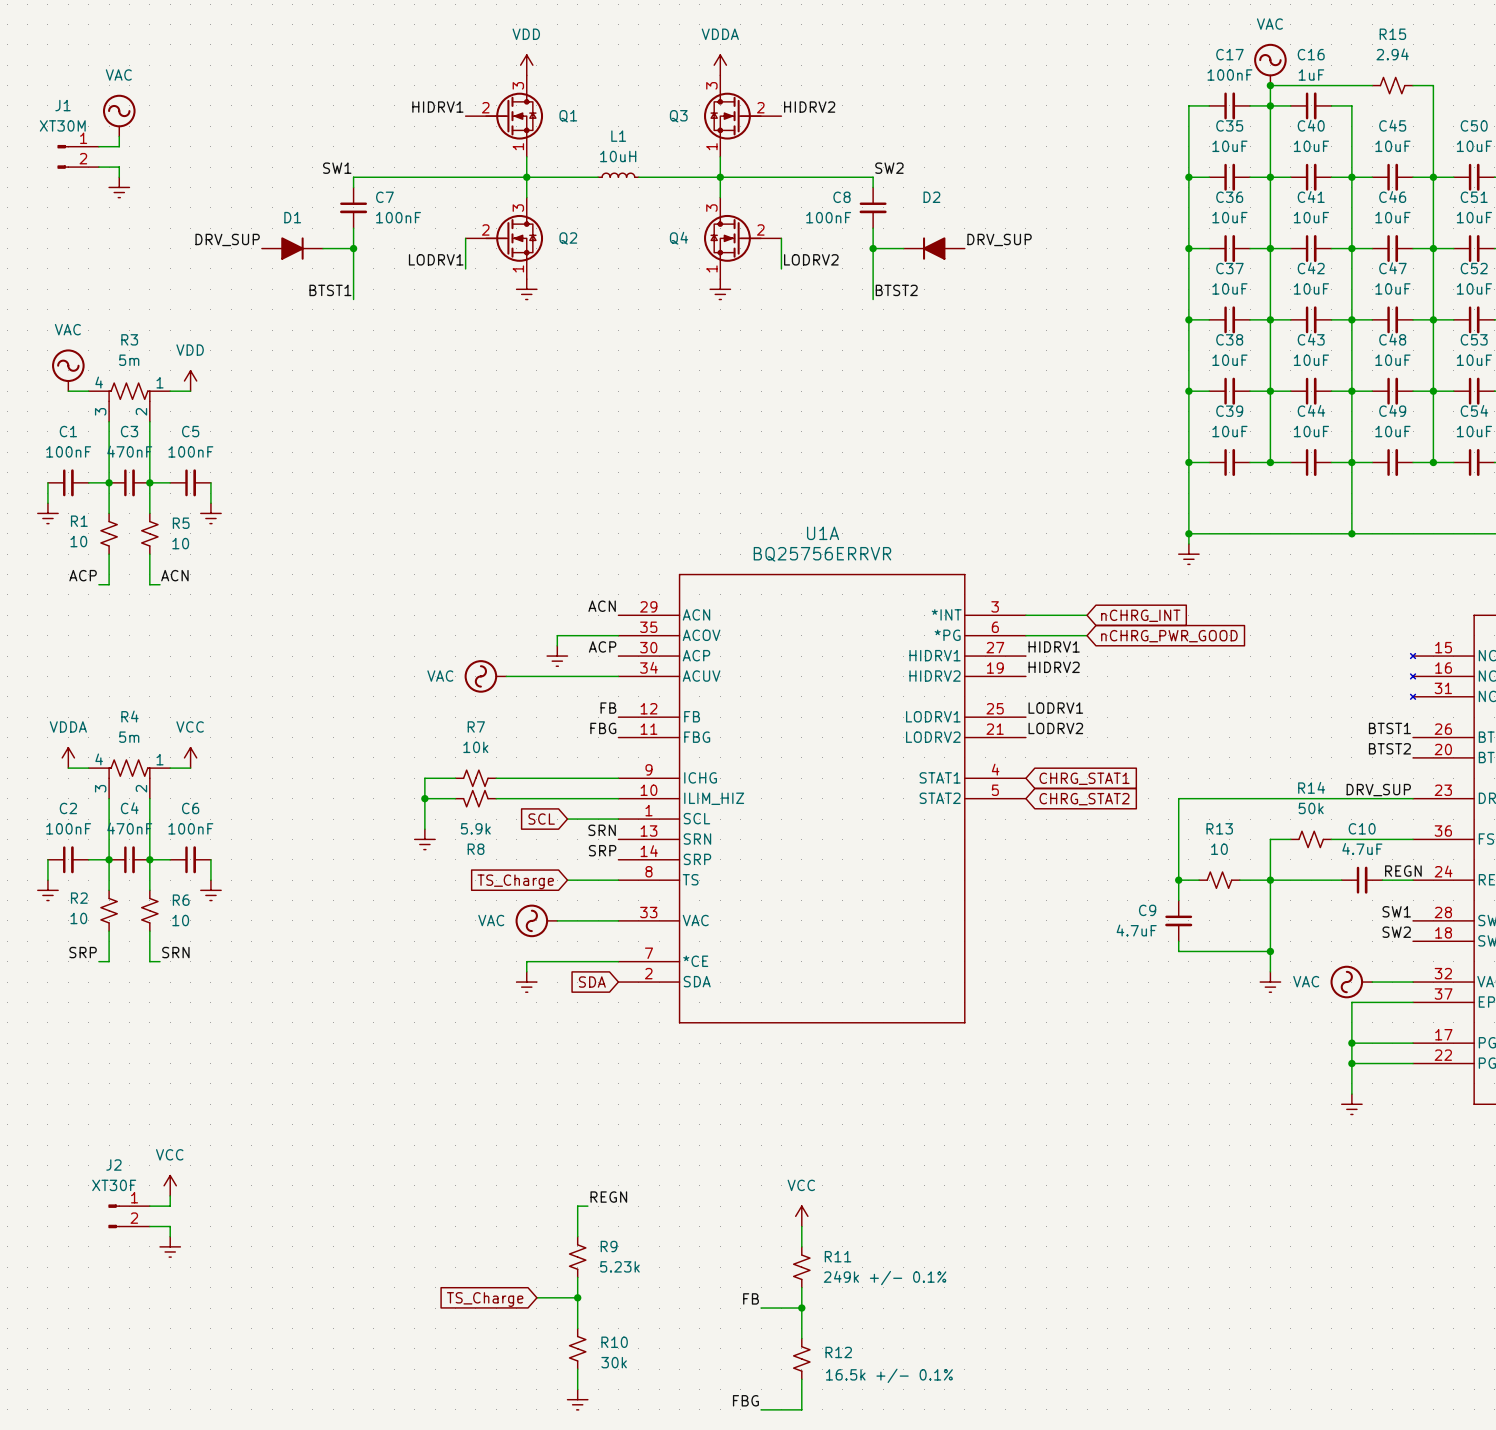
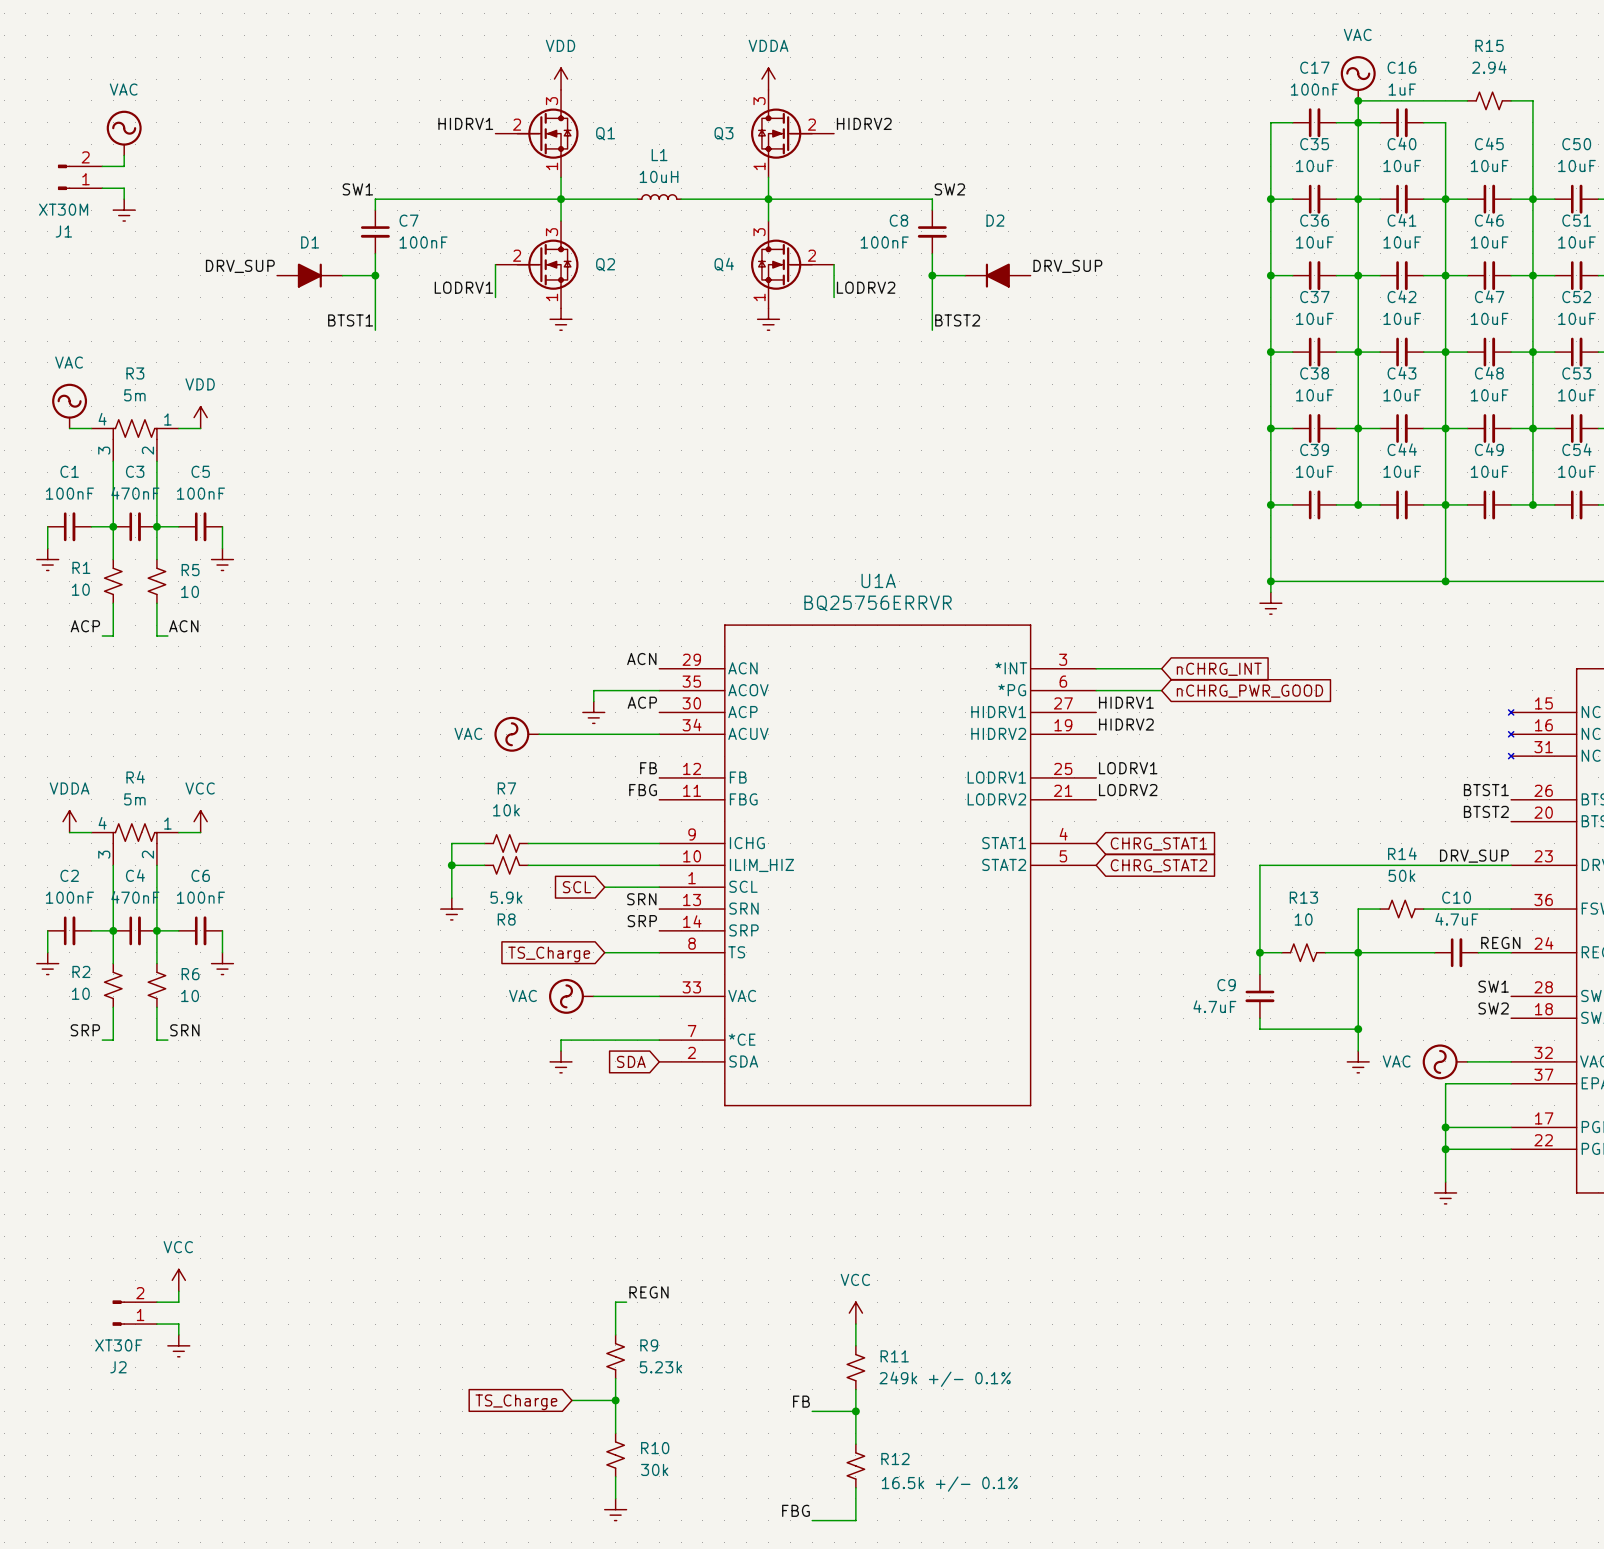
J1 flip: as is (63, 156) -> up-down (64, 177)
J2 flip: as is (114, 1216) -> up-down (118, 1313)

